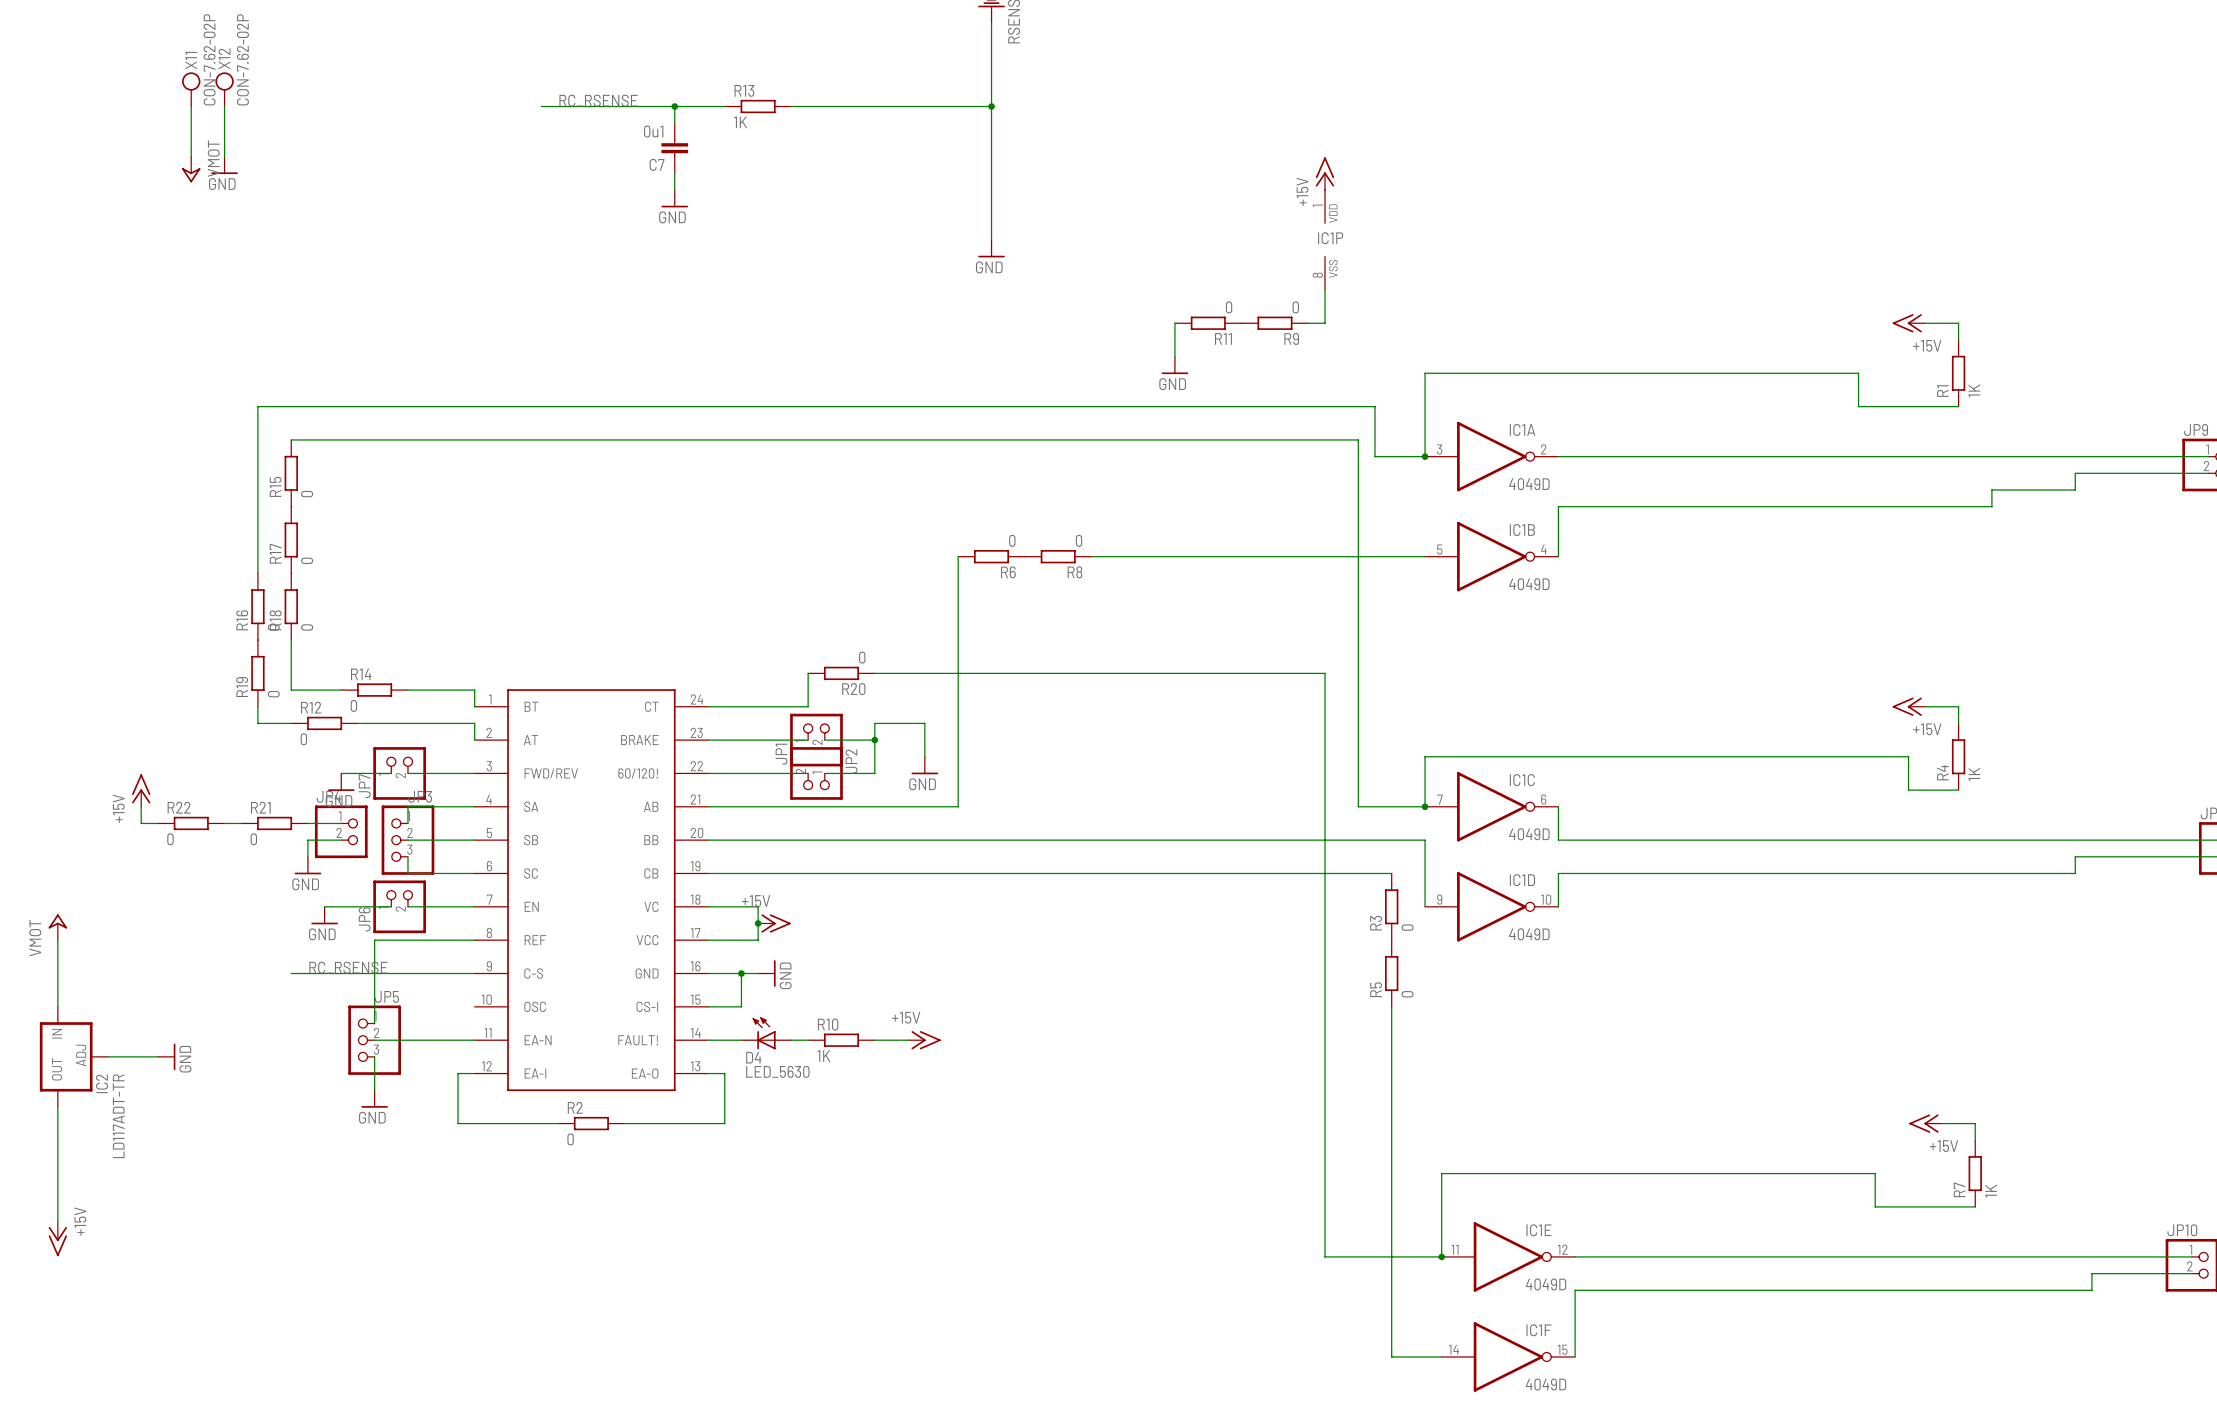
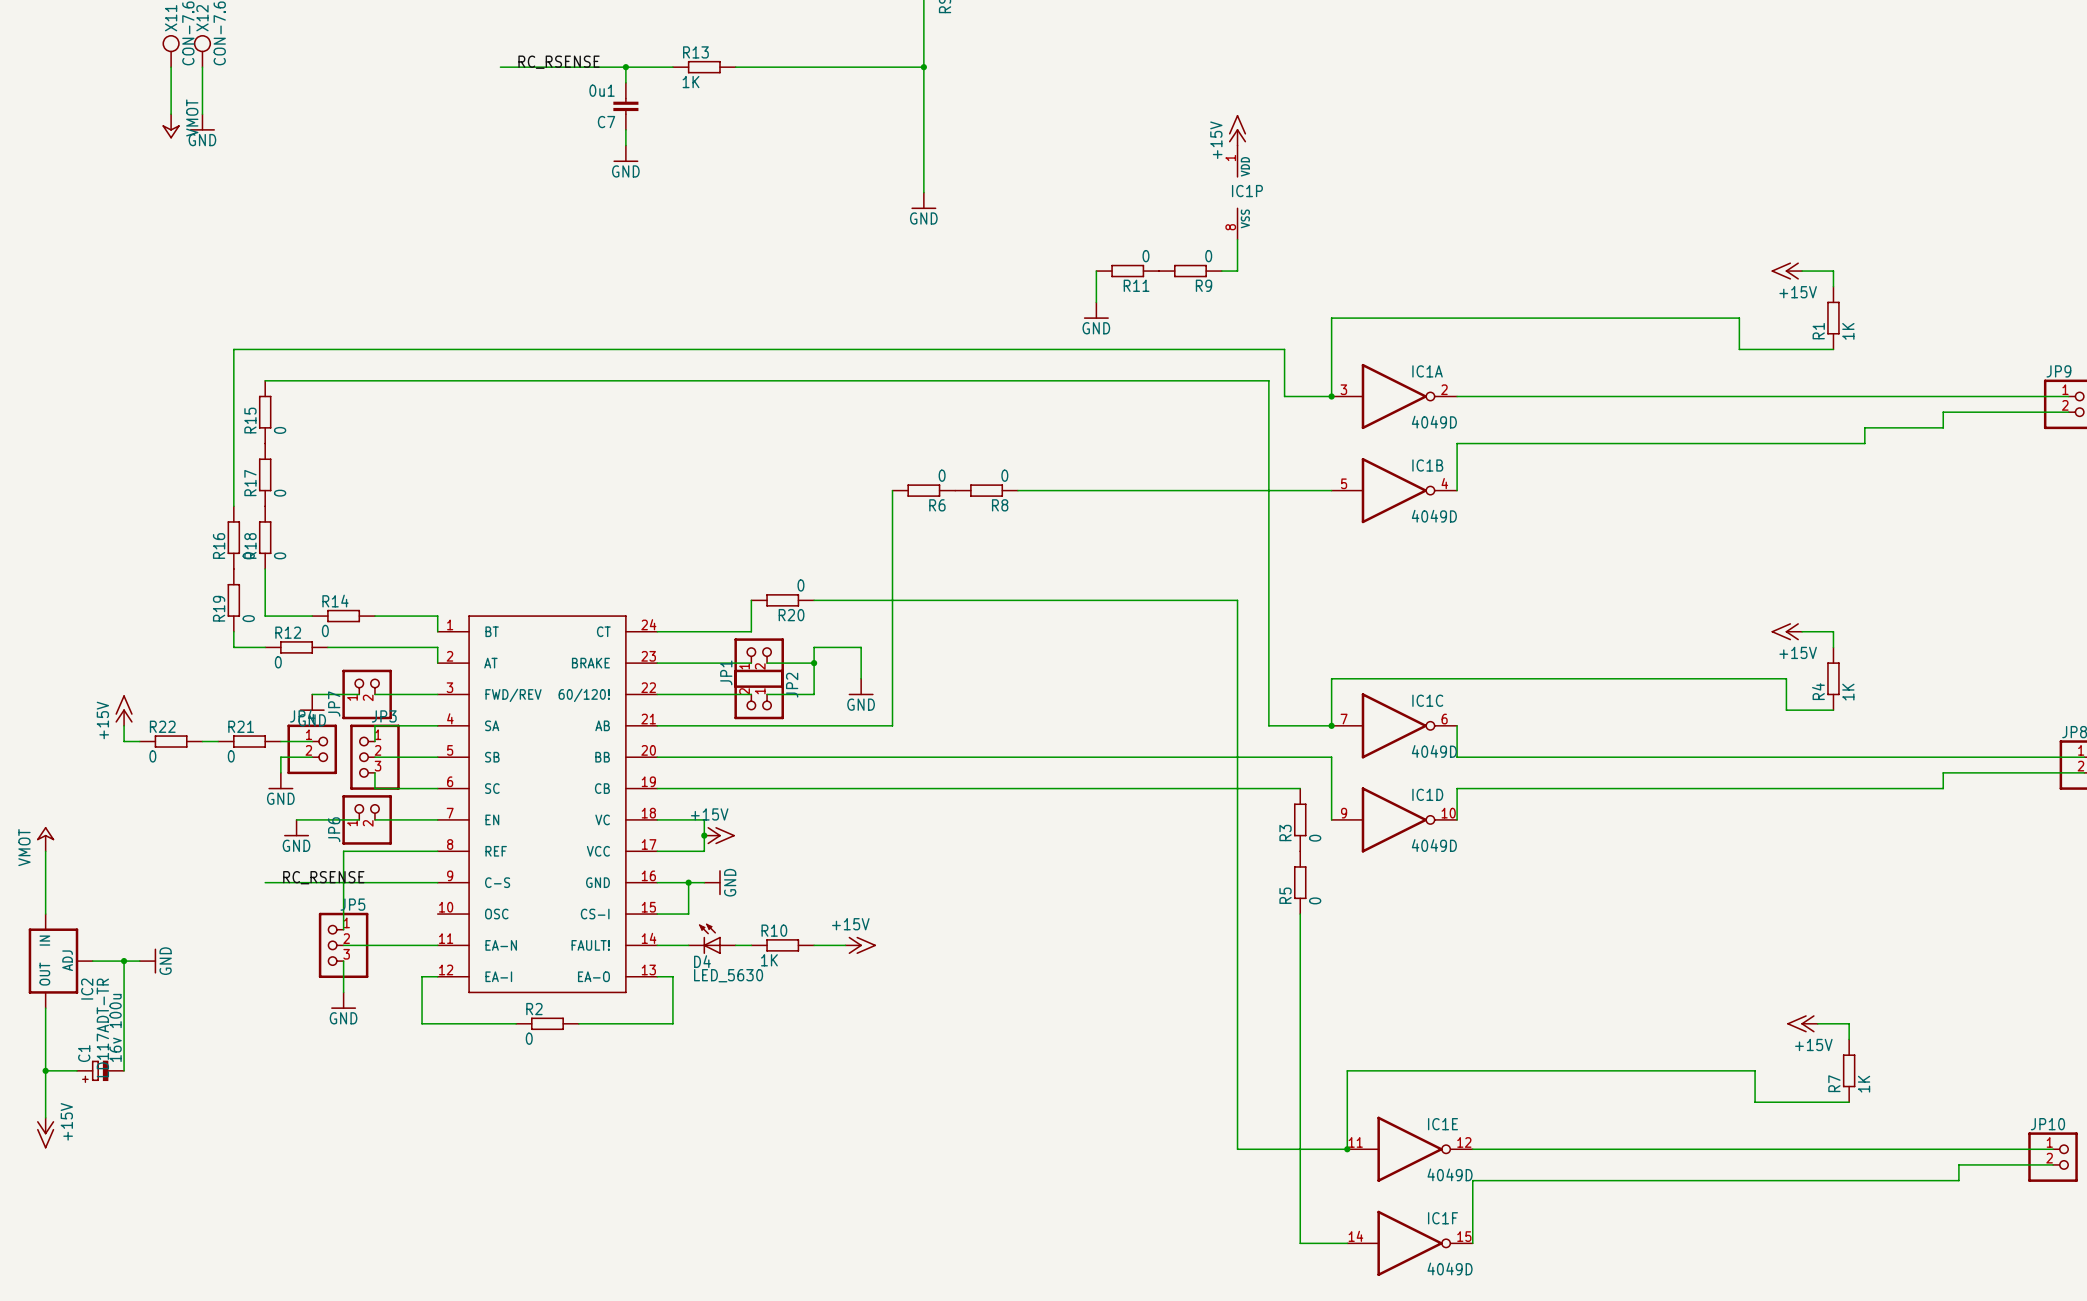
wire: none -> (124, 961) (124, 1070)
junction: none -> (124, 961)
wire: none -> (45, 1070) (77, 1070)
junction: none -> (45, 1070)
C1: none -> 16v 100u (100, 1070)

